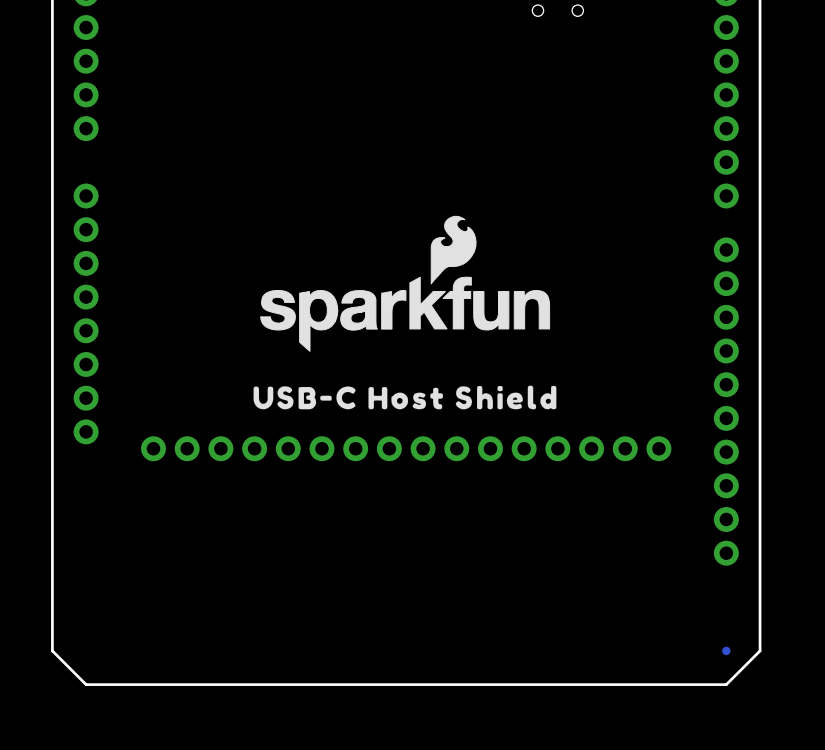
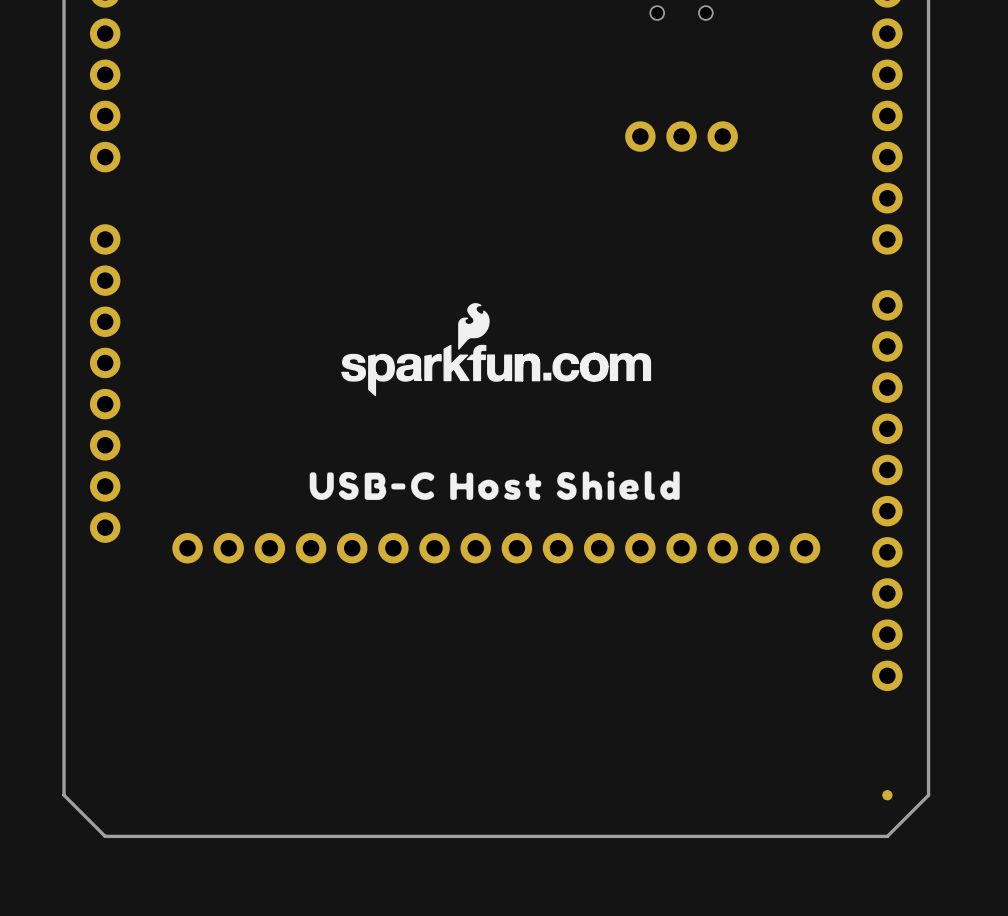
part: none -> (681, 136)
drawing shape: [260, 215, 551, 352] -> [341, 303, 652, 397]

